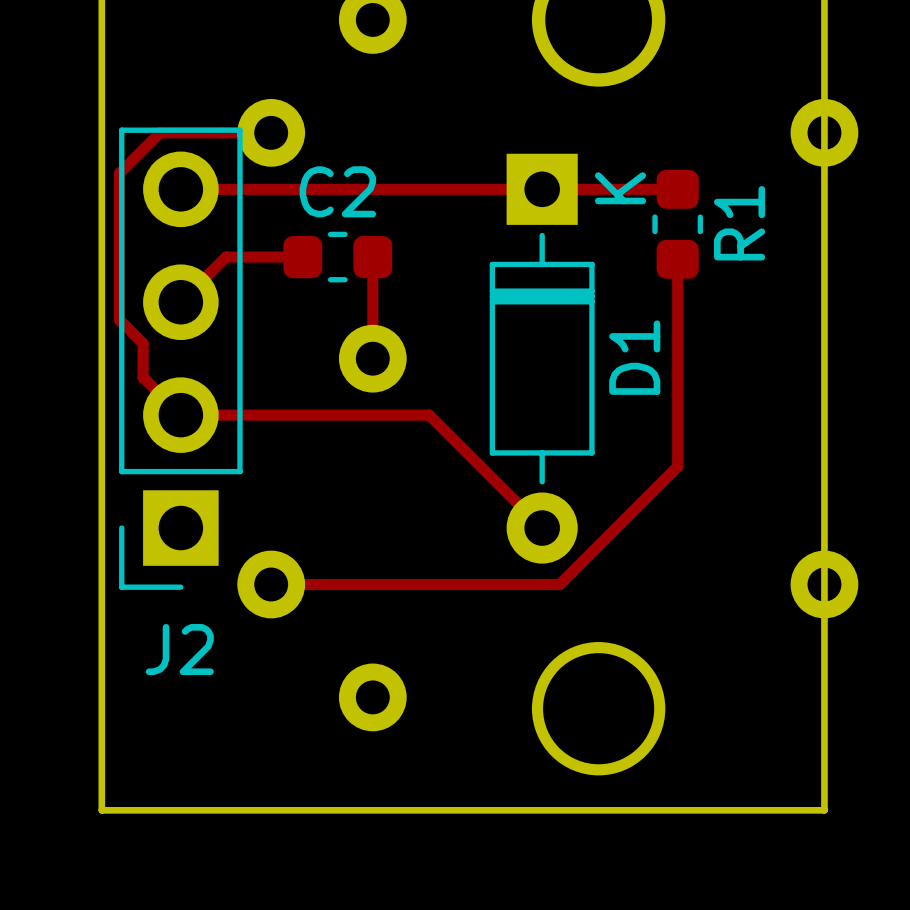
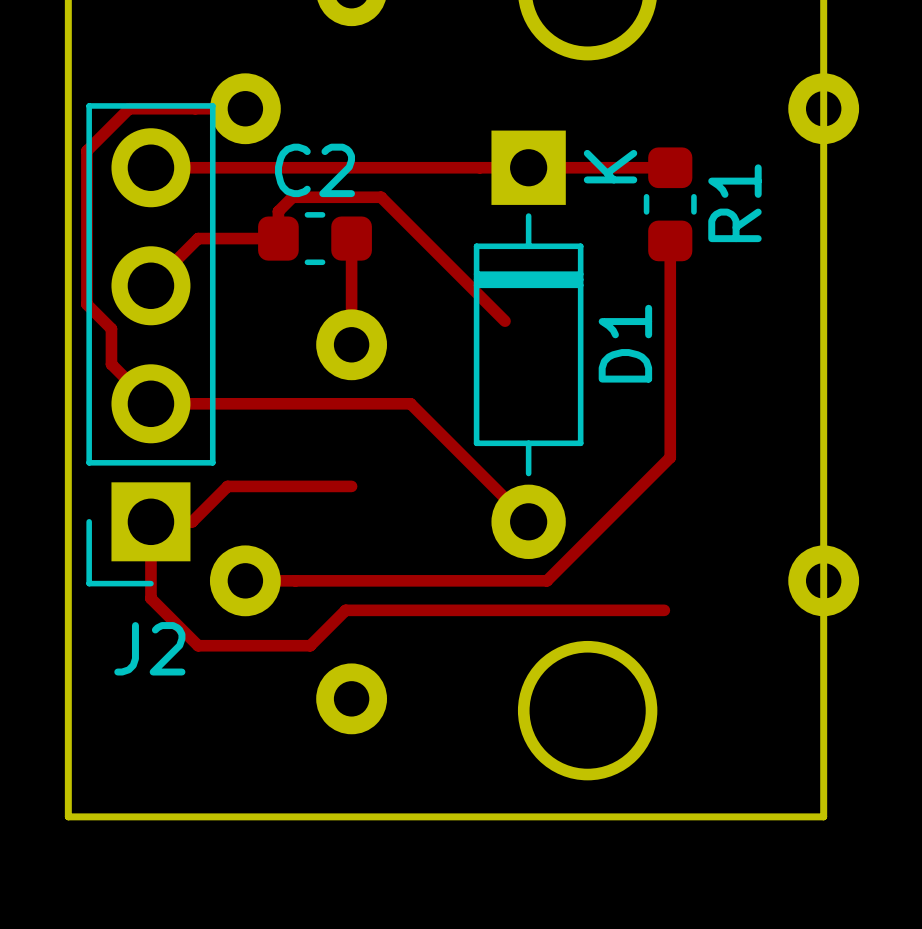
track: none -> (278, 238) (278, 211) (292, 197) (381, 197) (505, 321)
track: none -> (351, 486) (227, 486) (192, 521) (150, 521) (150, 598) (198, 645) (310, 645) (345, 610) (664, 610)

